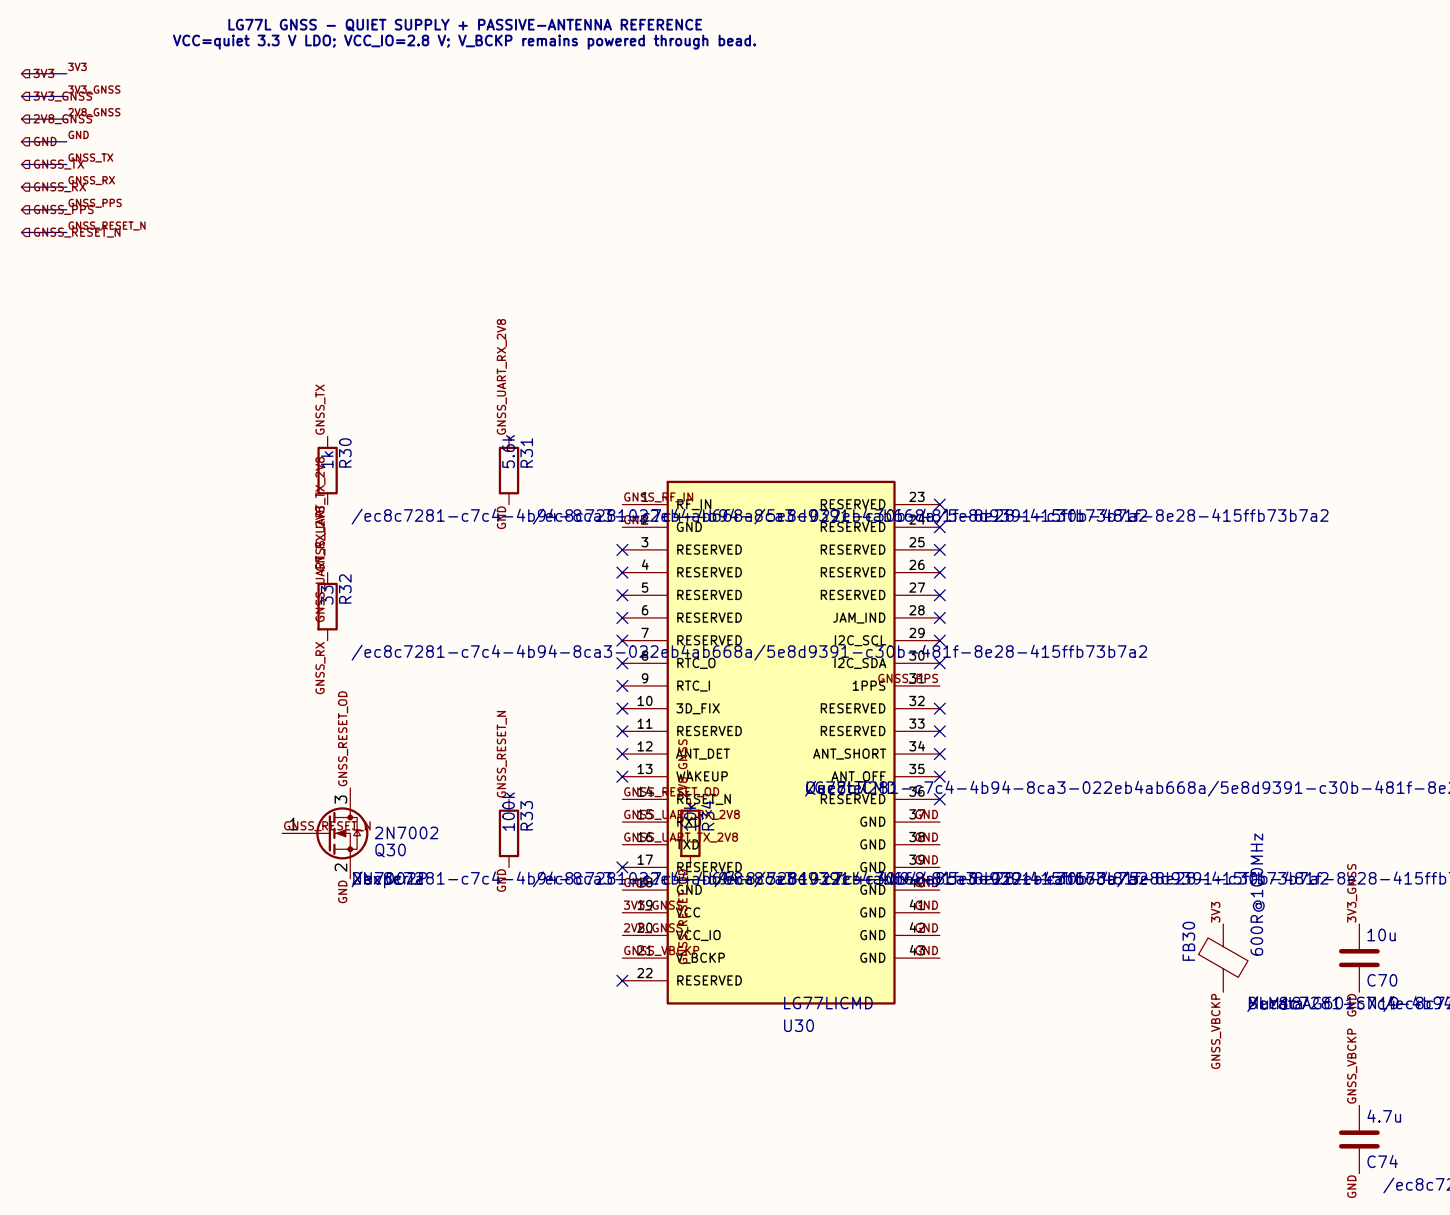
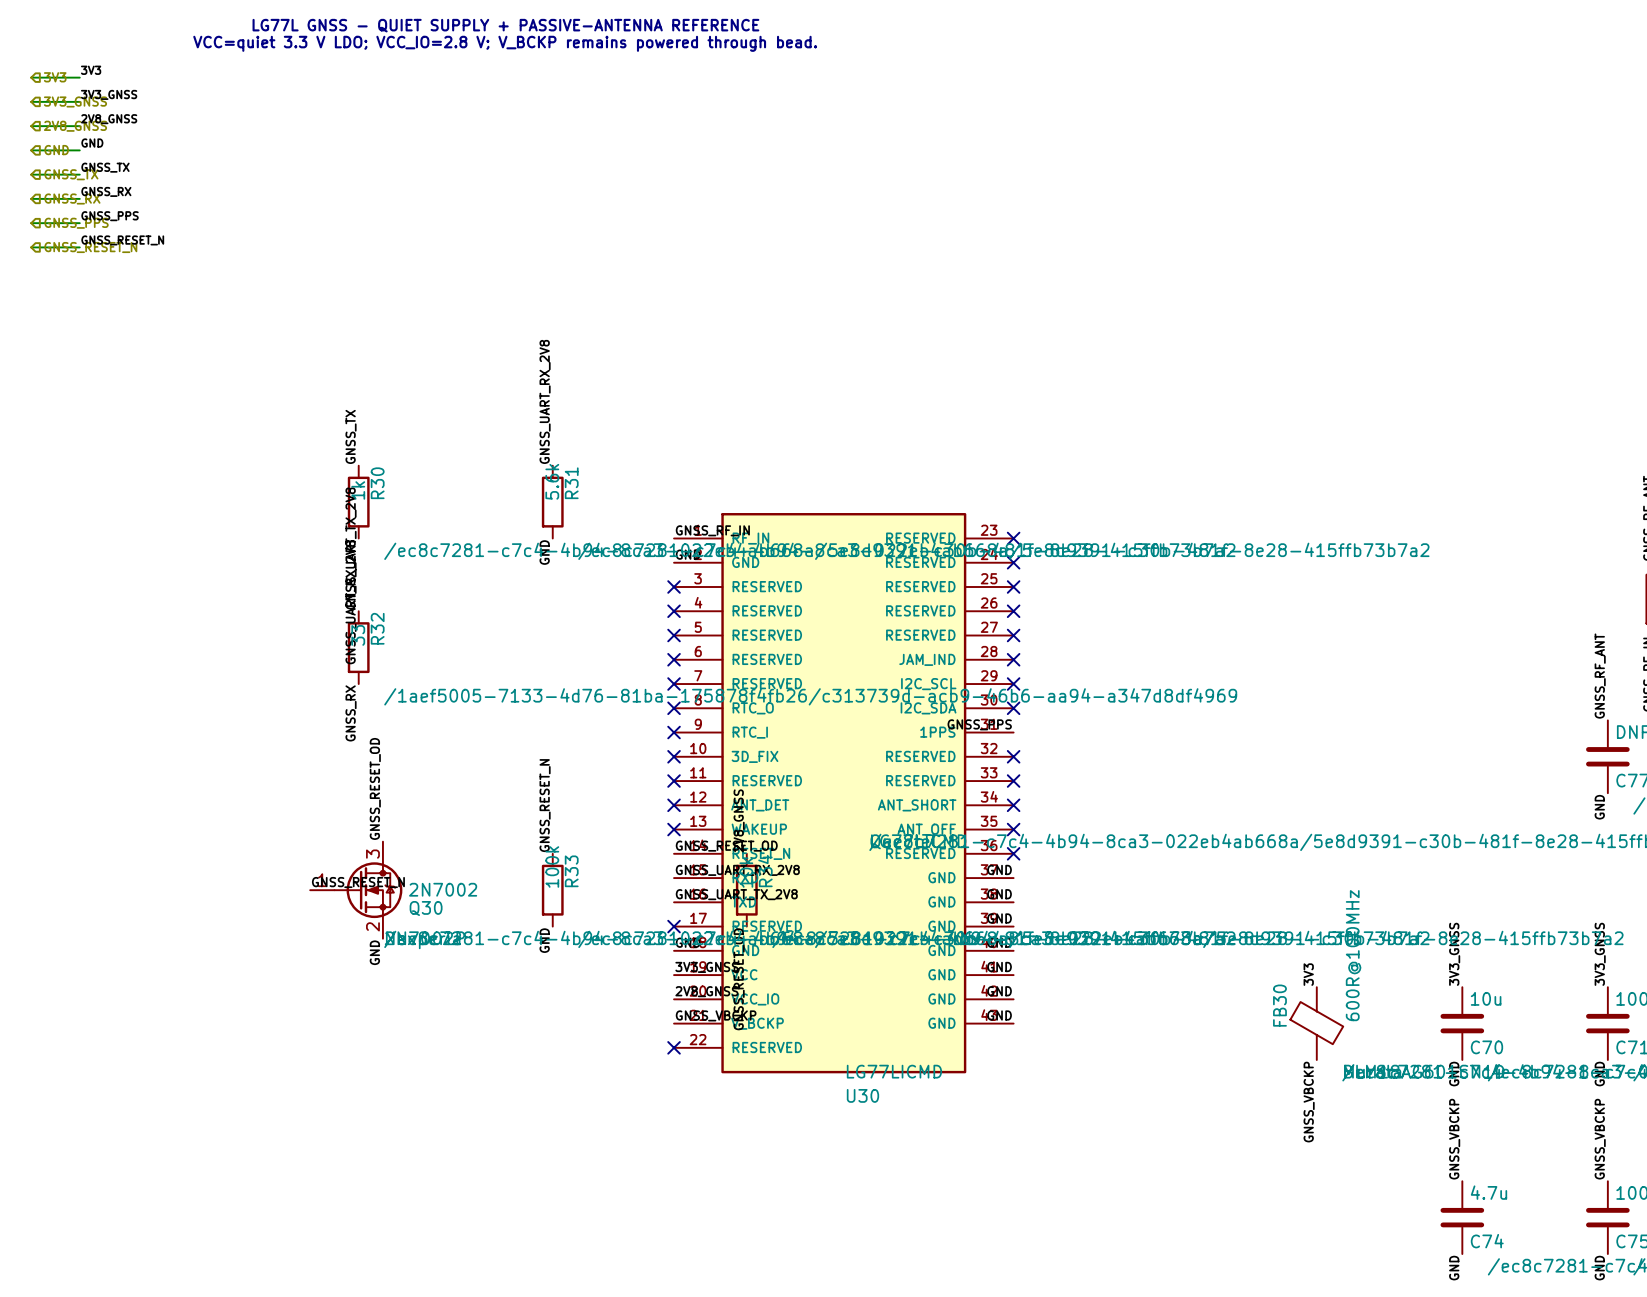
R32 text: /ec8c7281-c7c4-4b94-8ca3-022eb4ab668a/5e8d9391-c30b-481f-8e28-415ffb73b7a2 (749, 652) -> /1aef5005-7133-4d76-81ba-175878f4fb26/c313739d-acb9-46b6-aa94-a347d8df4969 (810, 696)

